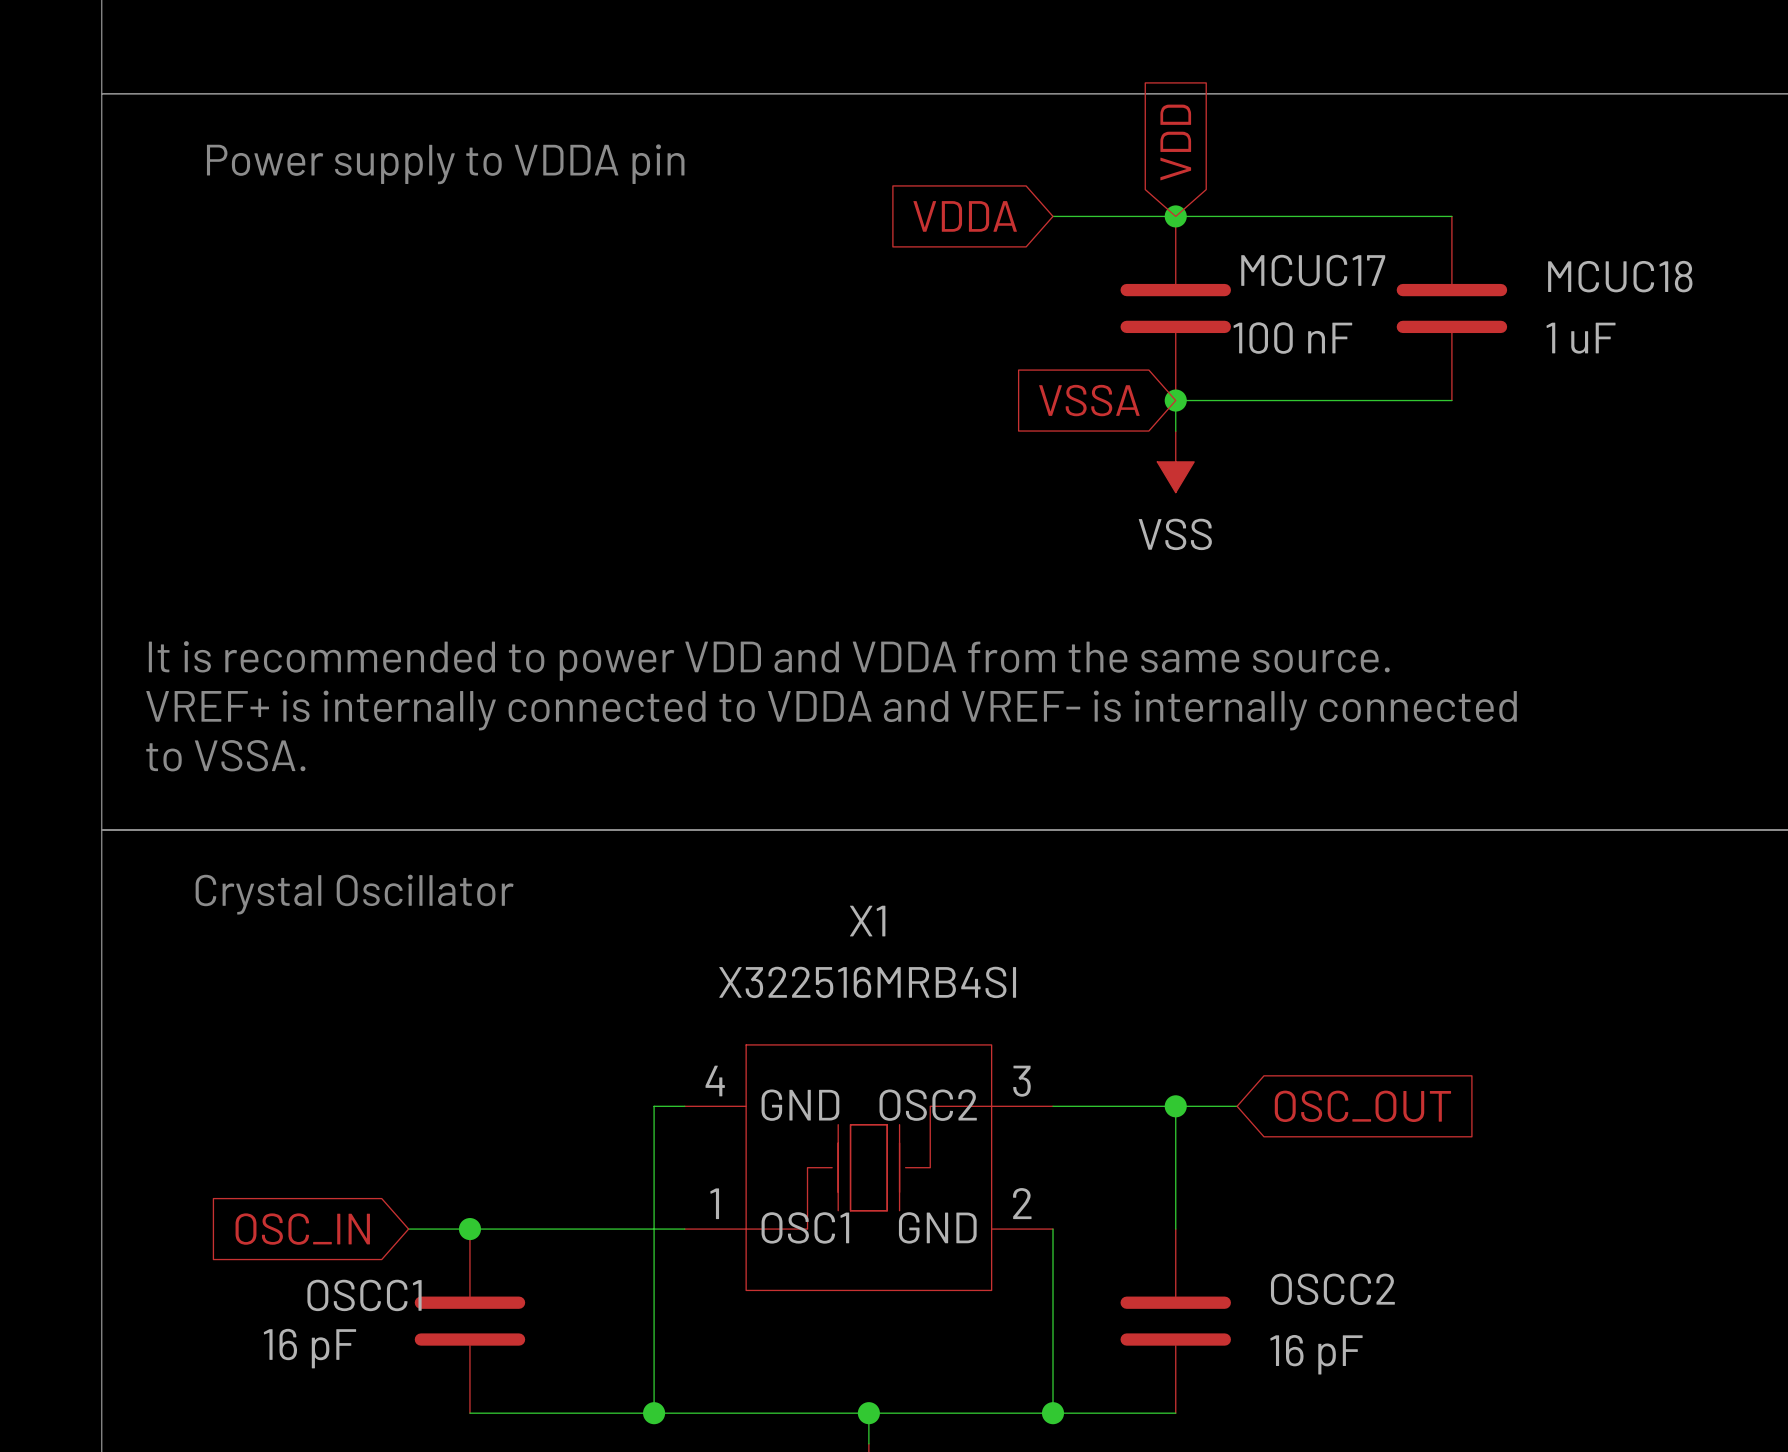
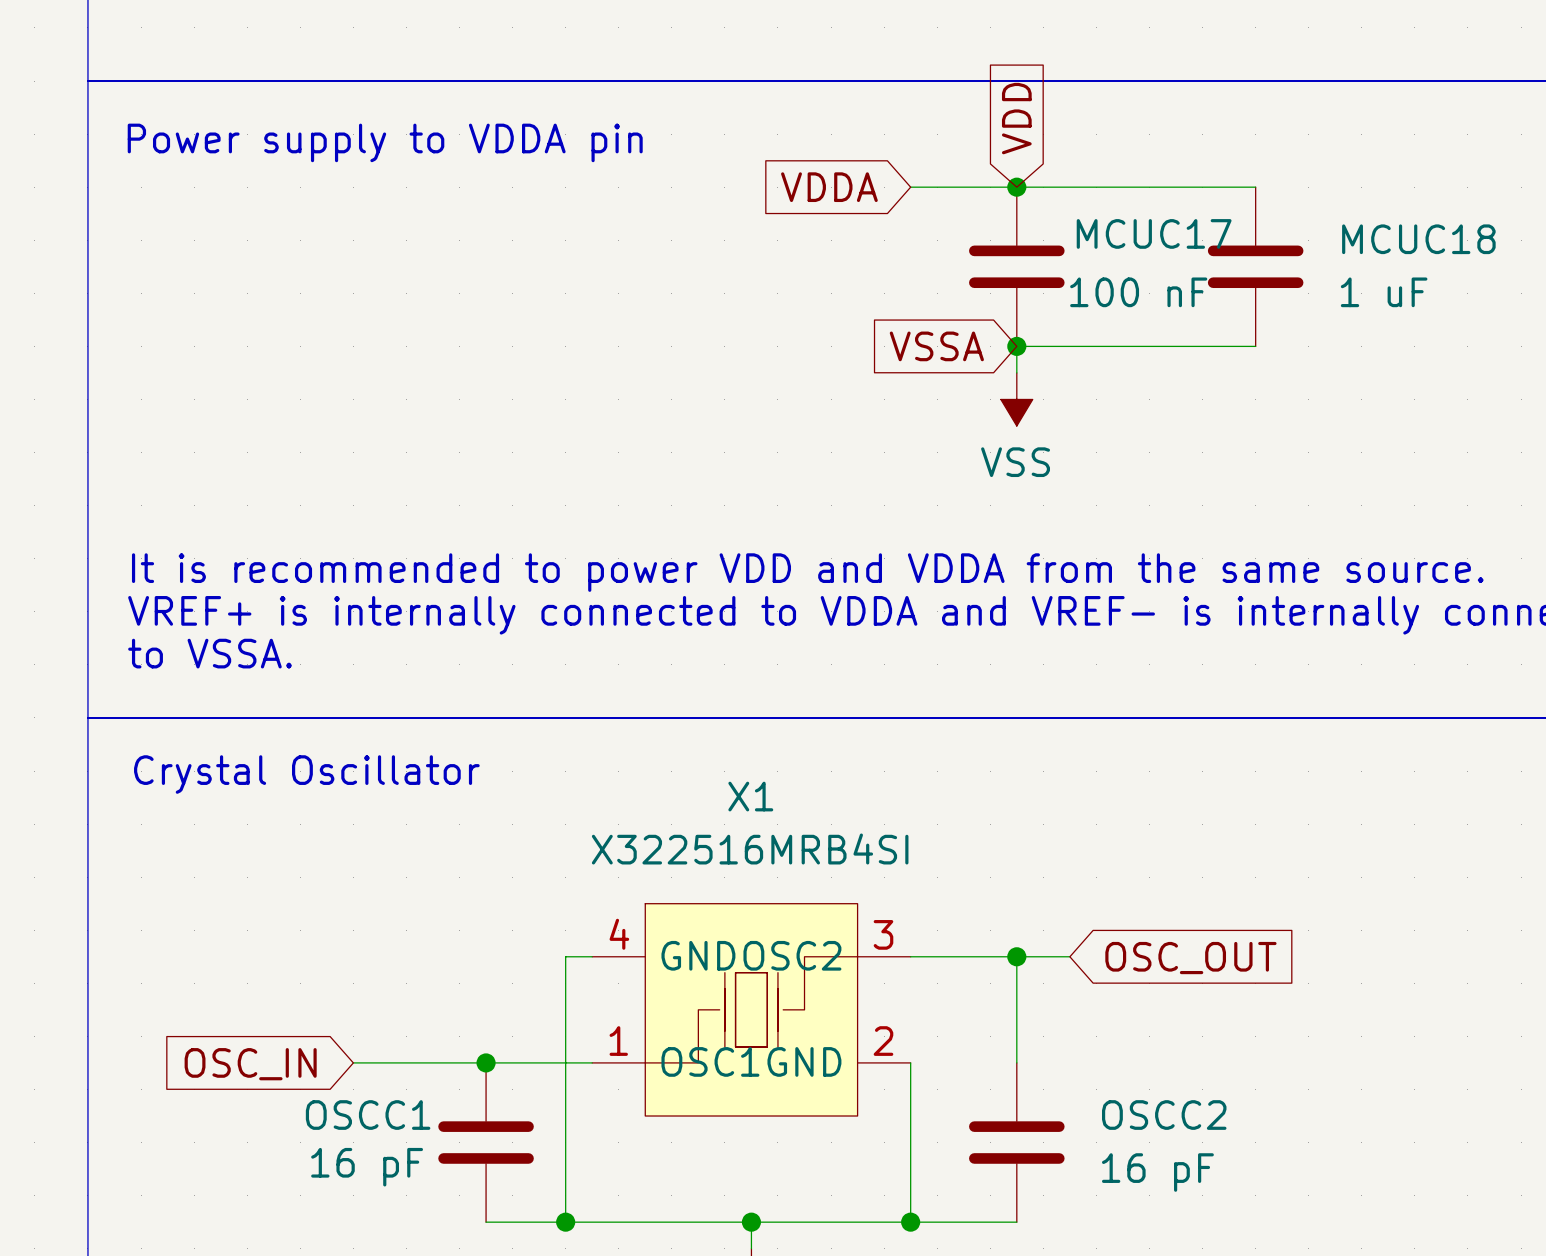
junction position: (469, 1229) -> (486, 1062)
OSCC1 name position: OSCC1 (364, 1295) -> OSCC1 (368, 1115)
OSCC1 position: (469, 1321) -> (486, 1142)
wire: (469, 1413) (562, 1413) -> none

